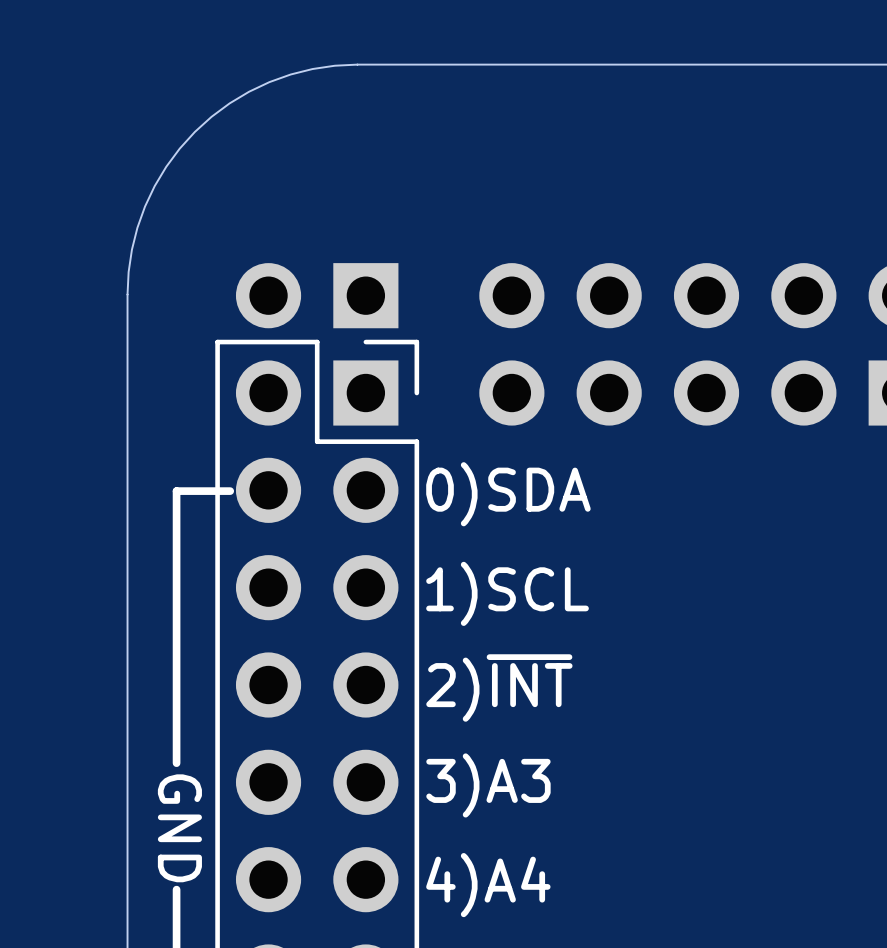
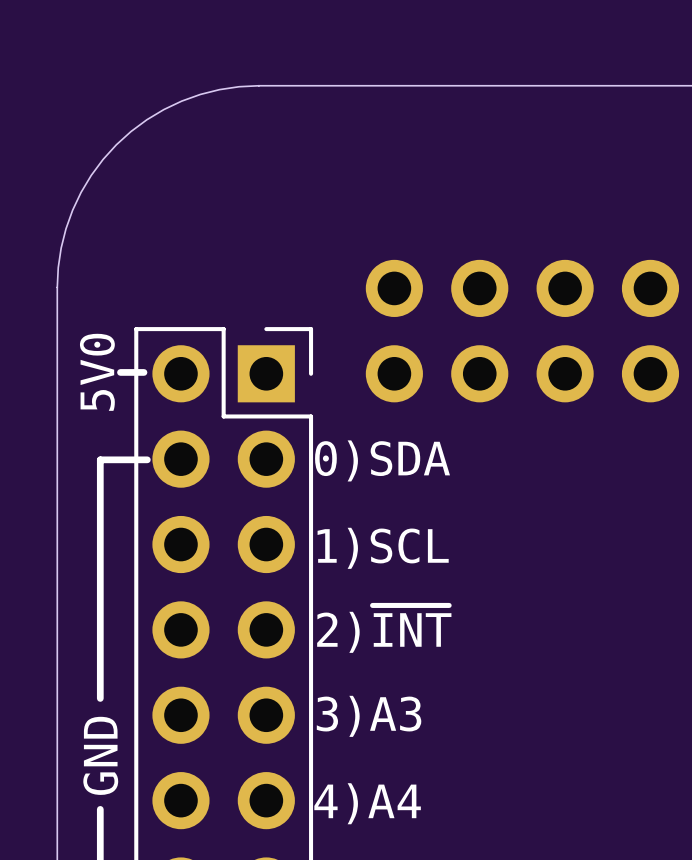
part: (317, 295) -> none
text: none -> 5V0 (97, 372)
line: none -> (144, 372) (120, 372)
text rotation: 0° (179, 828) -> 180° (100, 755)

